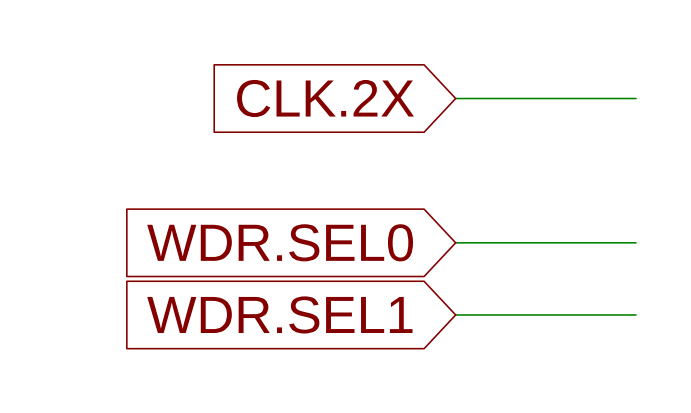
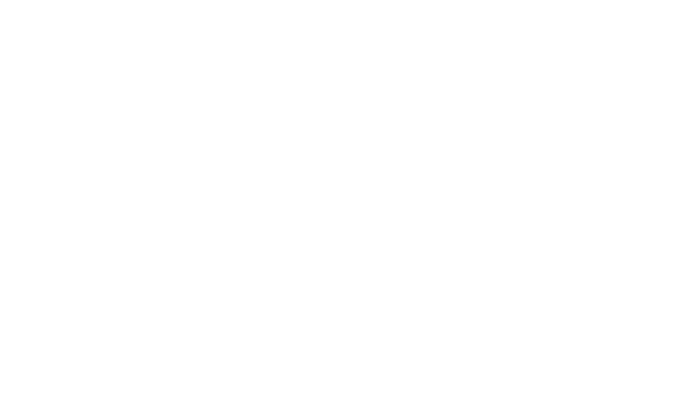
global label: CLK.2X (325, 98) -> none
wire: (455, 98) (636, 98) -> none
global label: WDR.SEL0 (280, 242) -> none
wire: (455, 242) (636, 242) -> none
global label: WDR.SEL1 (279, 314) -> none
wire: (455, 314) (636, 314) -> none

